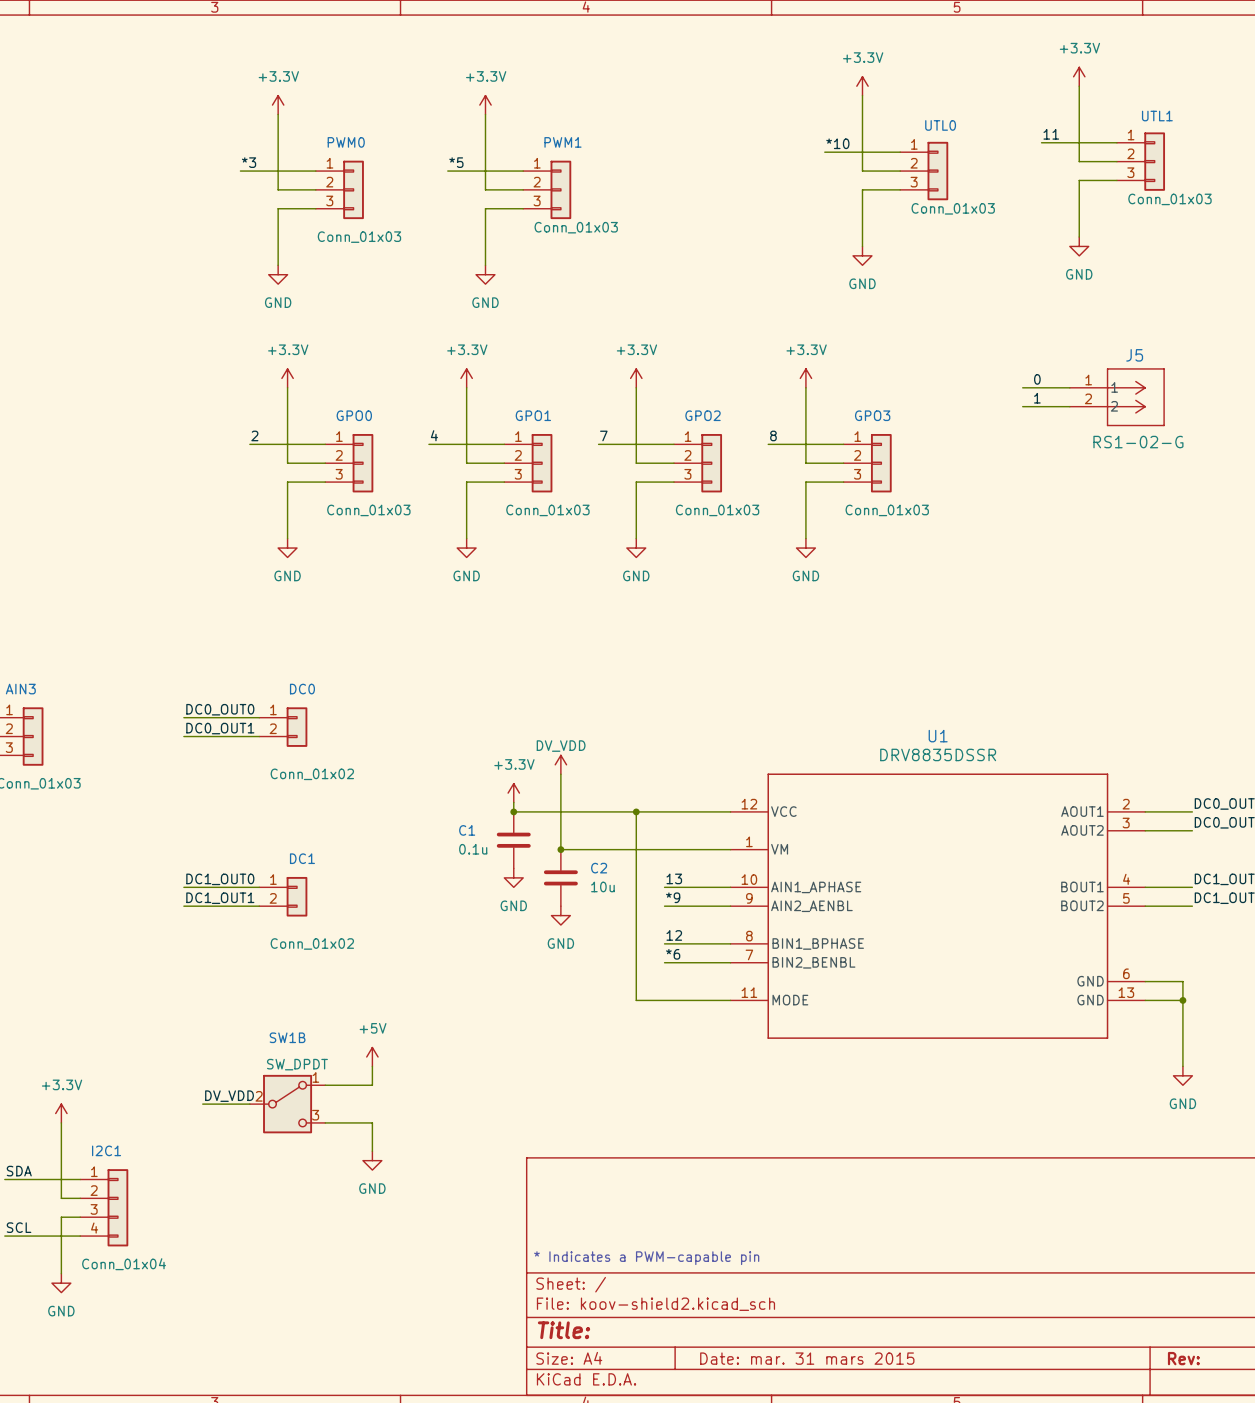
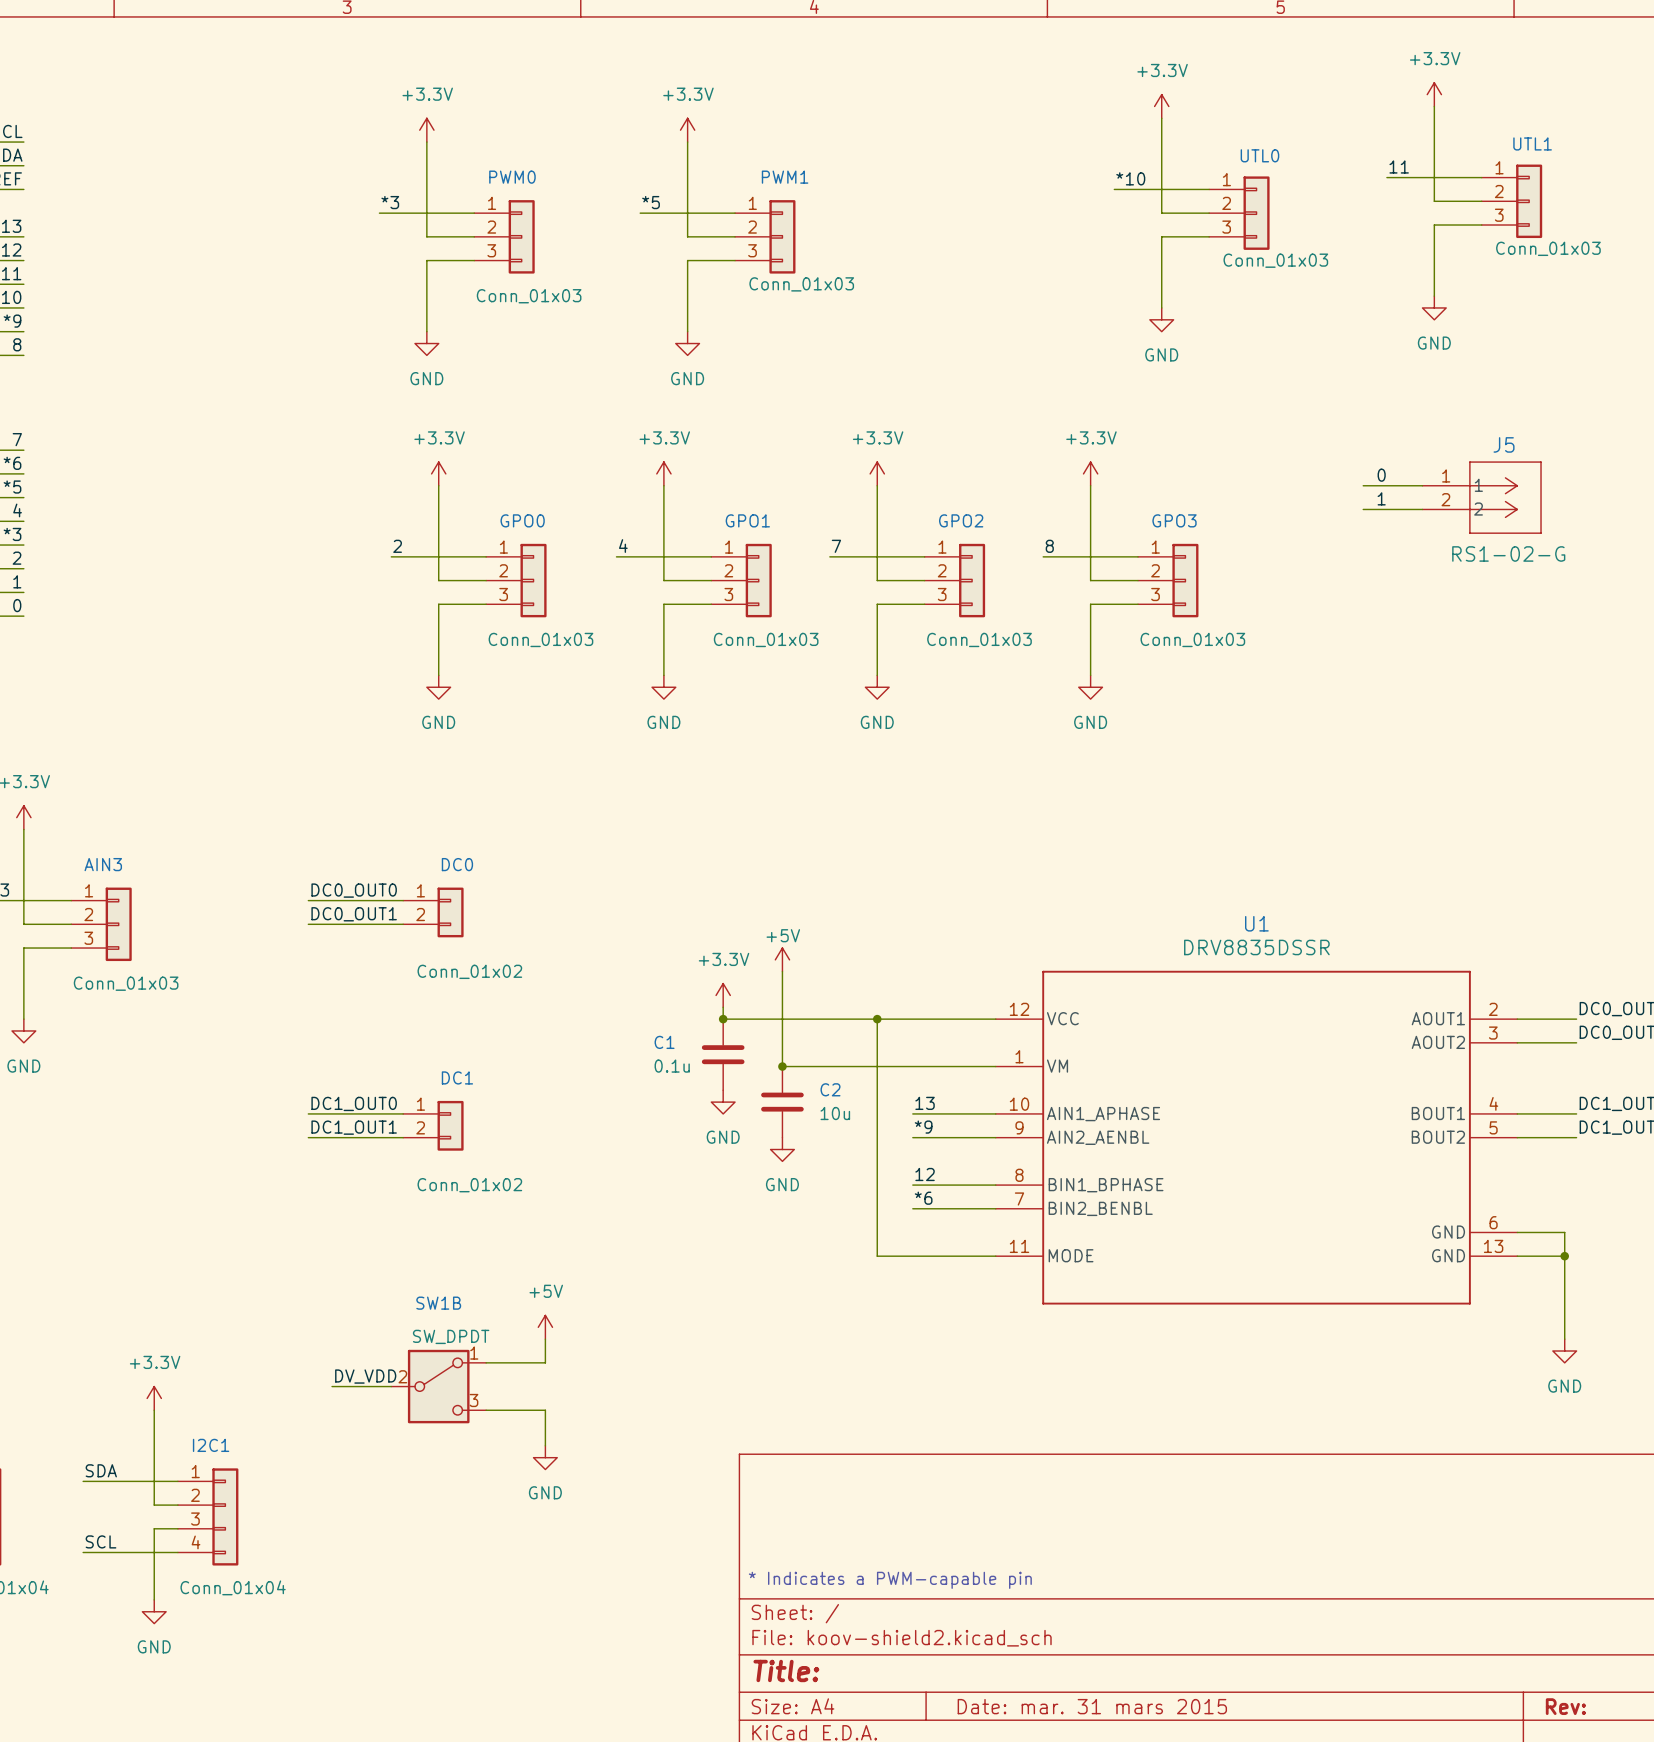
power symbol: DV_VDD (560, 764) -> +5V (782, 959)

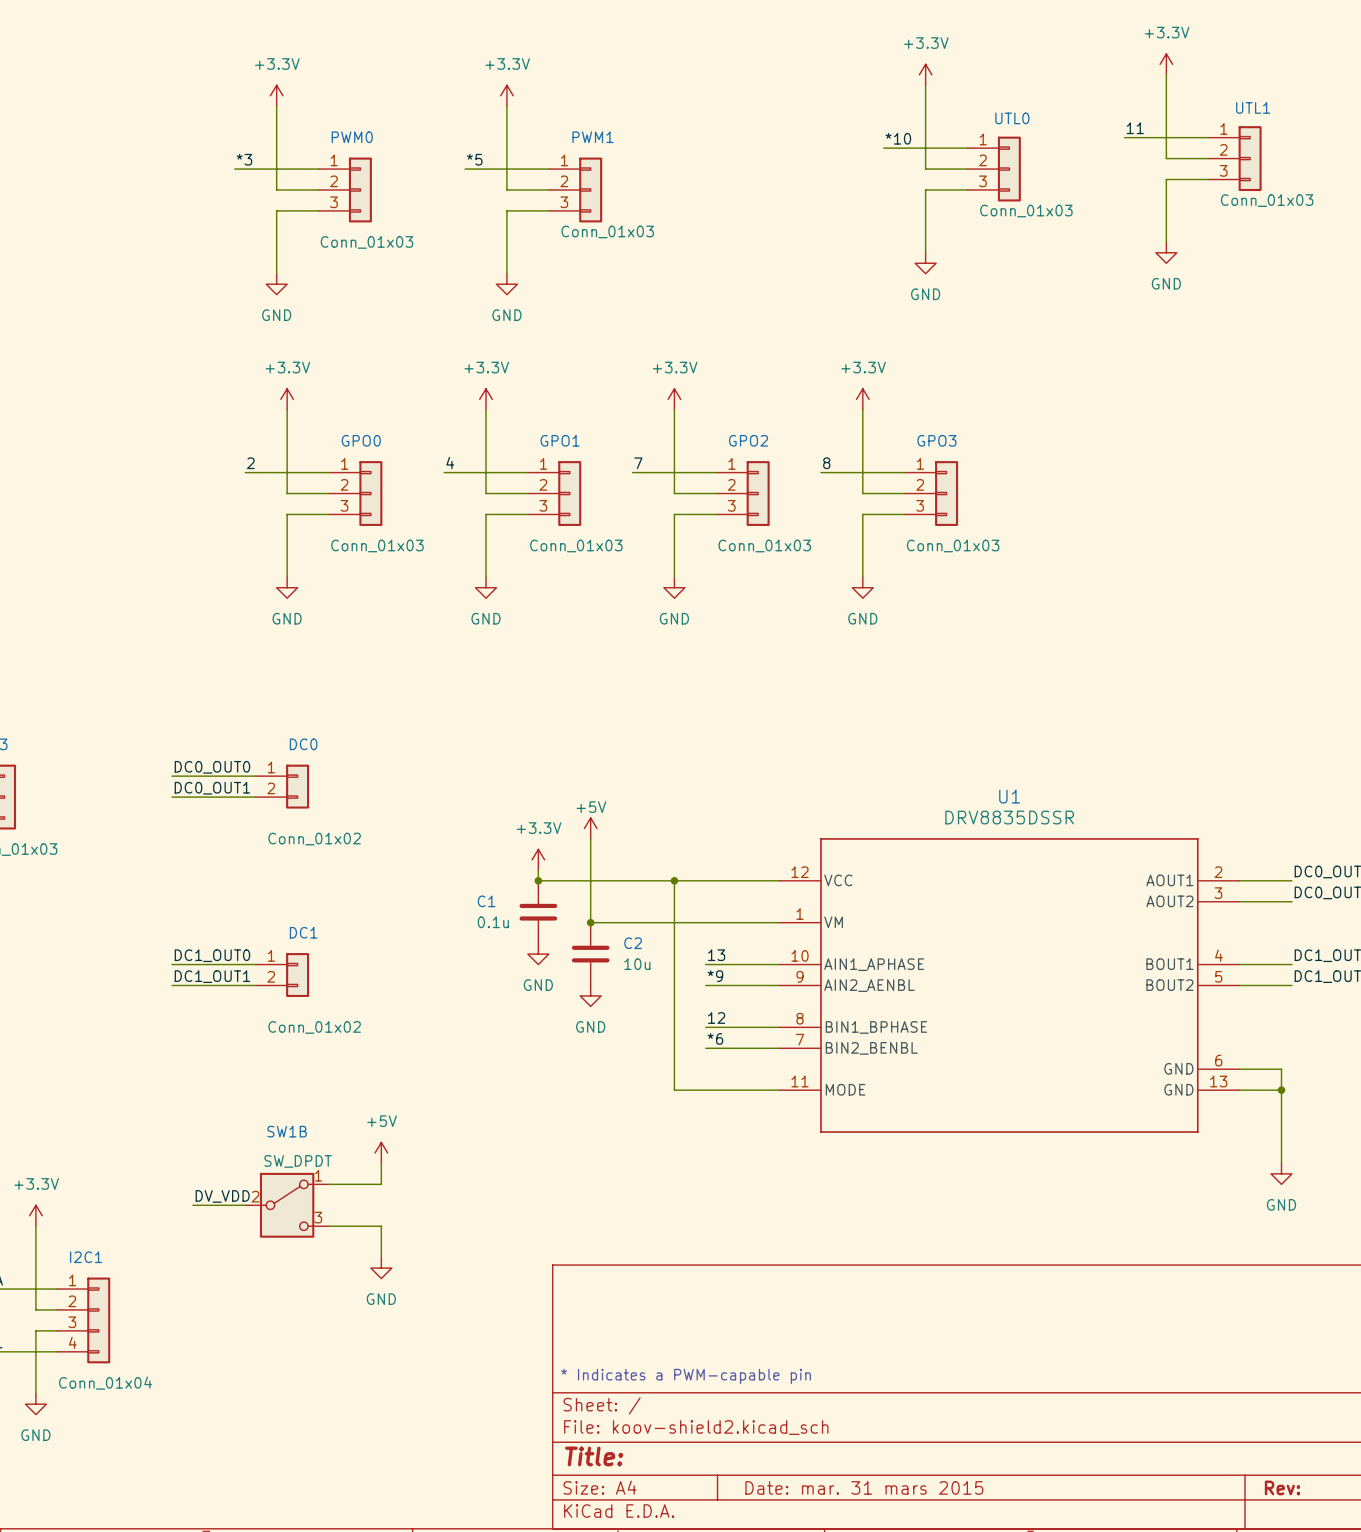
label: 0 (1381, 475) -> none
wire: (1363, 485) (1422, 485) -> none
J5: RS1-02-G (1482, 497) -> none
label: 1 (1381, 498) -> none
wire: (1363, 509) (1422, 509) -> none

